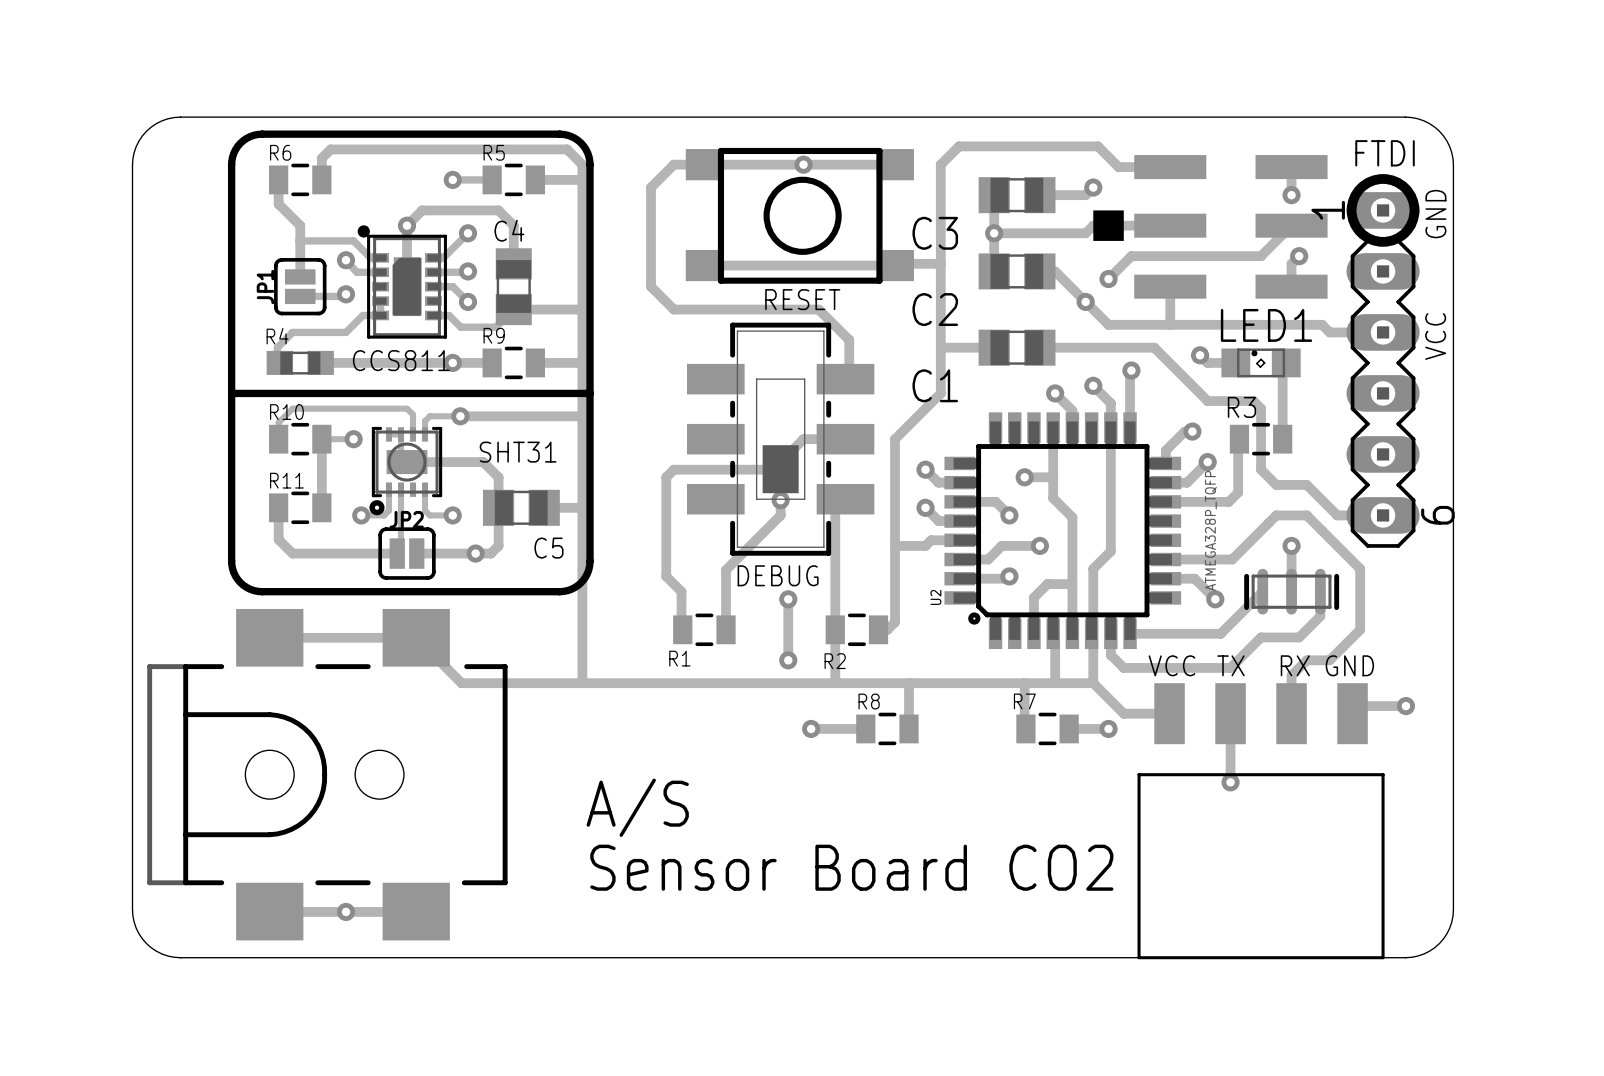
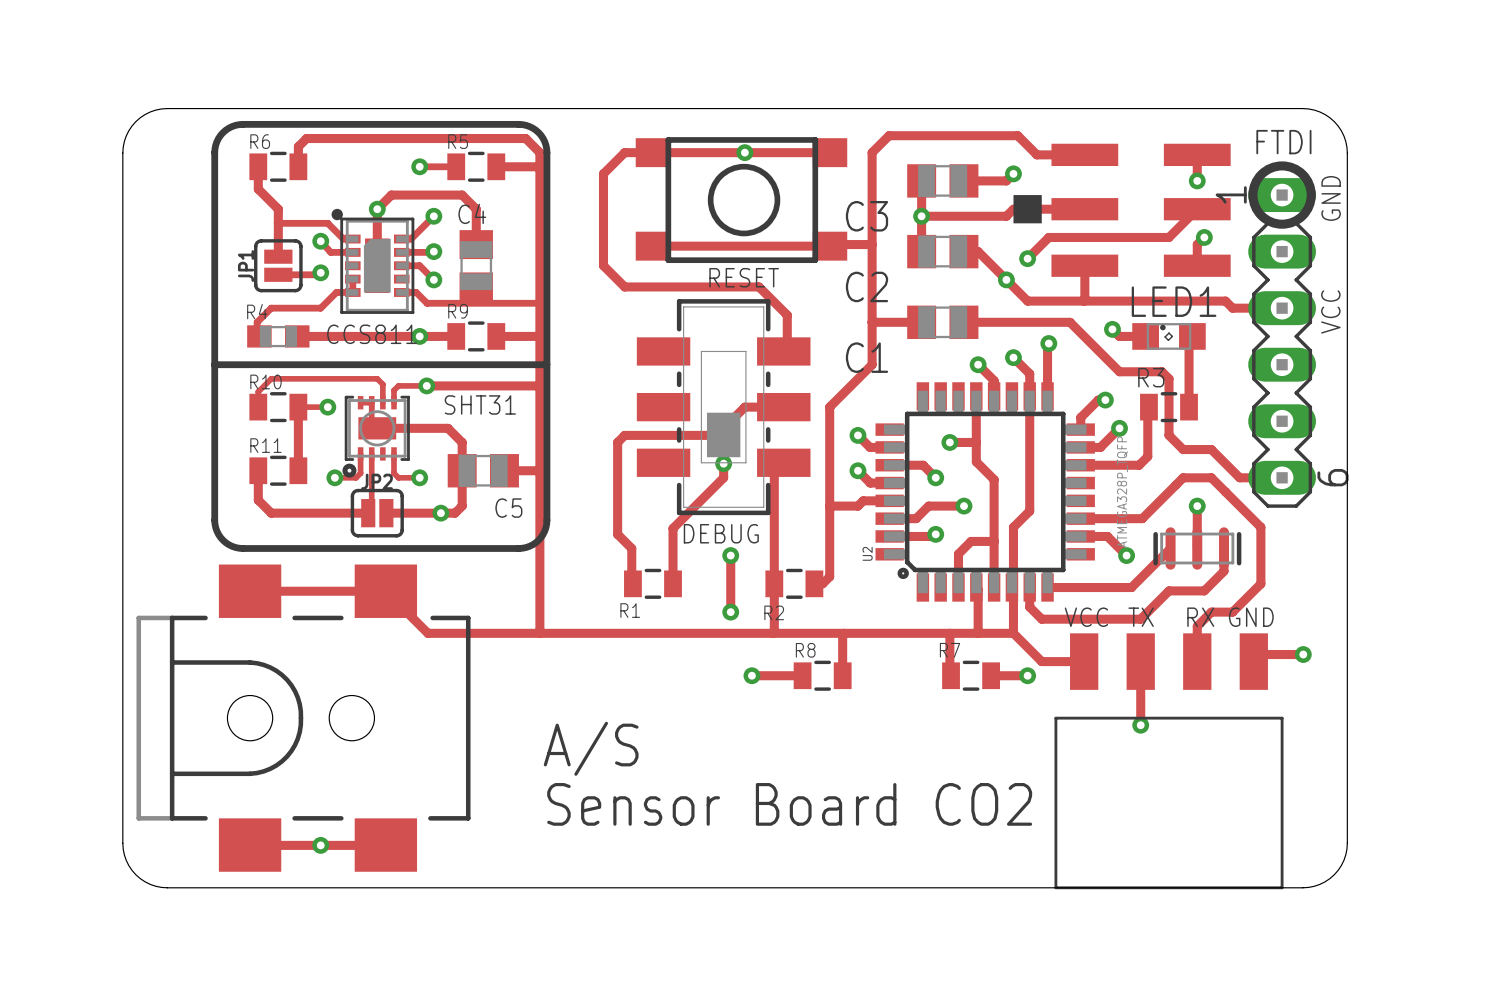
track: (582, 309) (513, 309) (496, 327) -> (544, 303) (459, 303)
text position: SHT31 (518, 452) -> SHT31 (480, 404)

